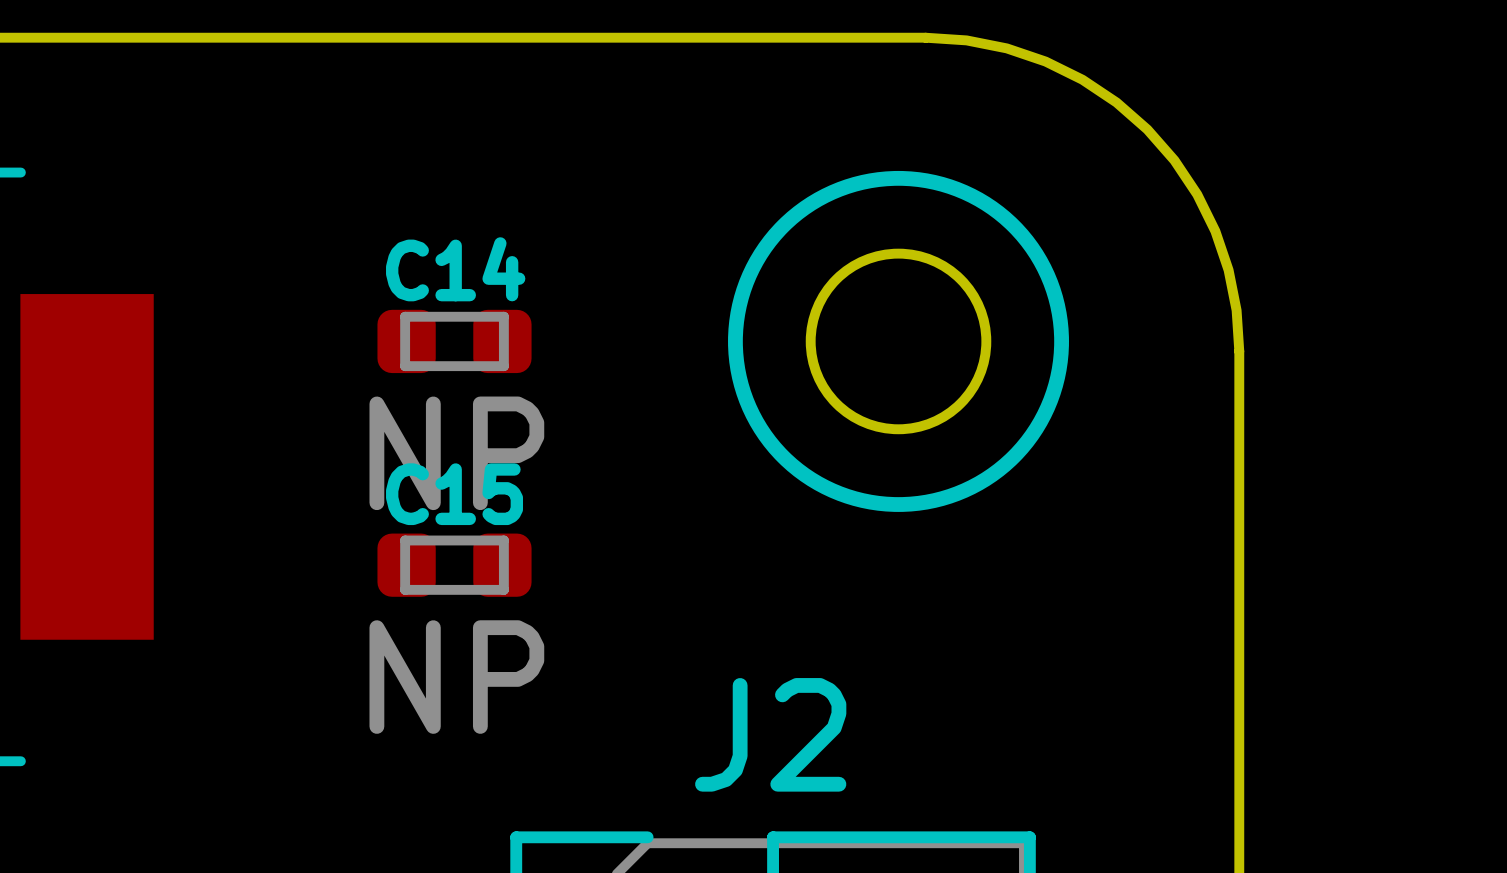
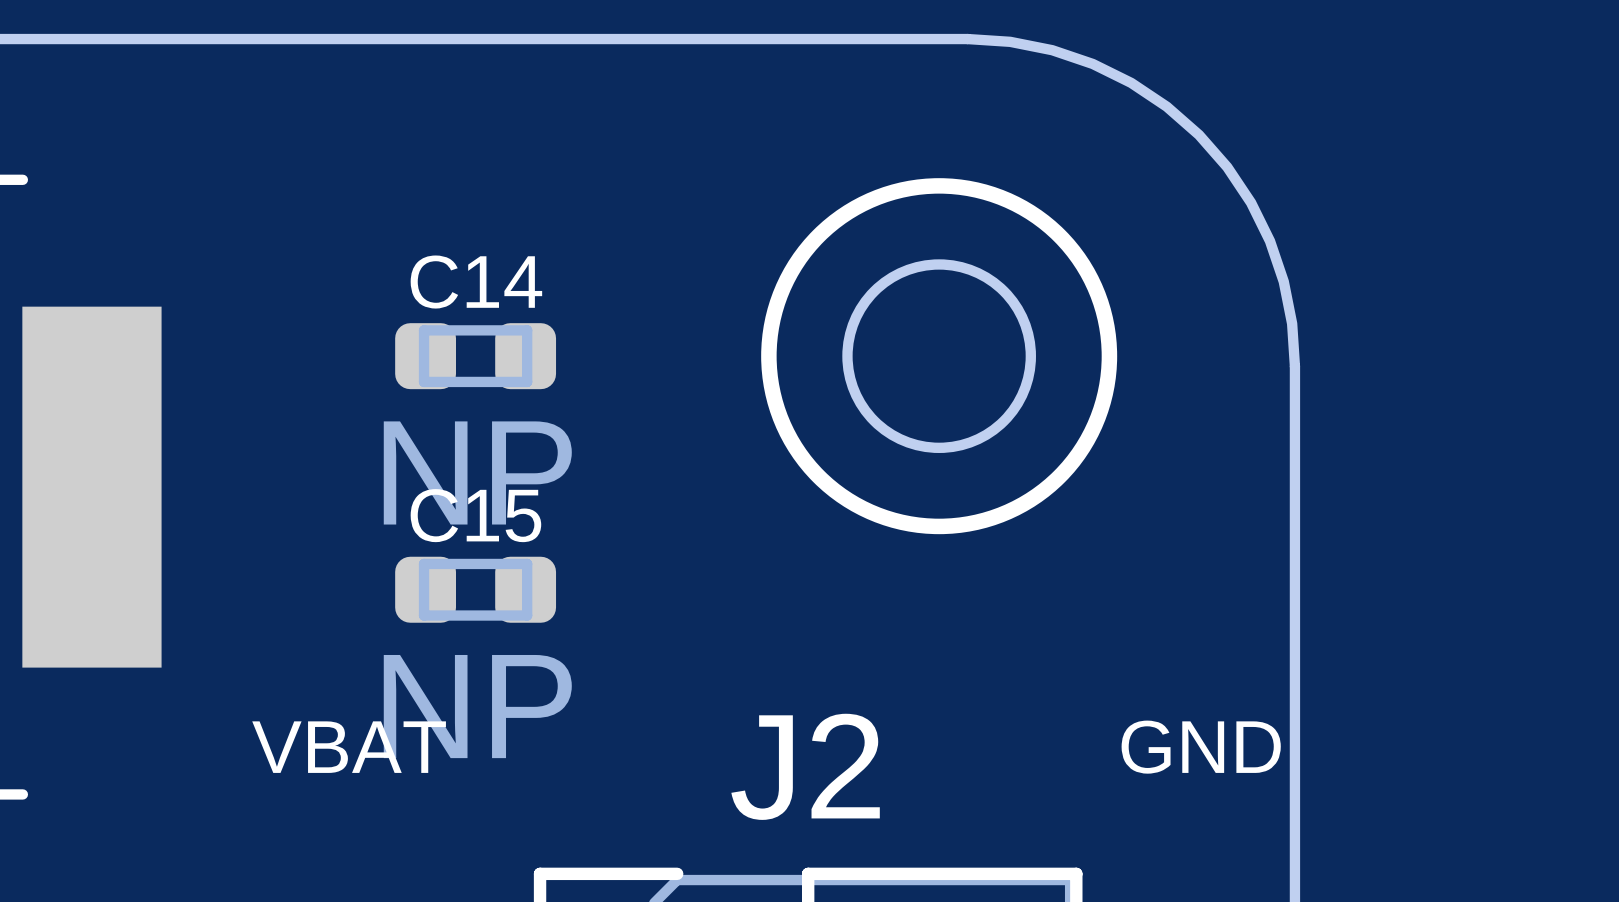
text: none -> VBAT (349, 747)
text: none -> GND (1201, 747)

